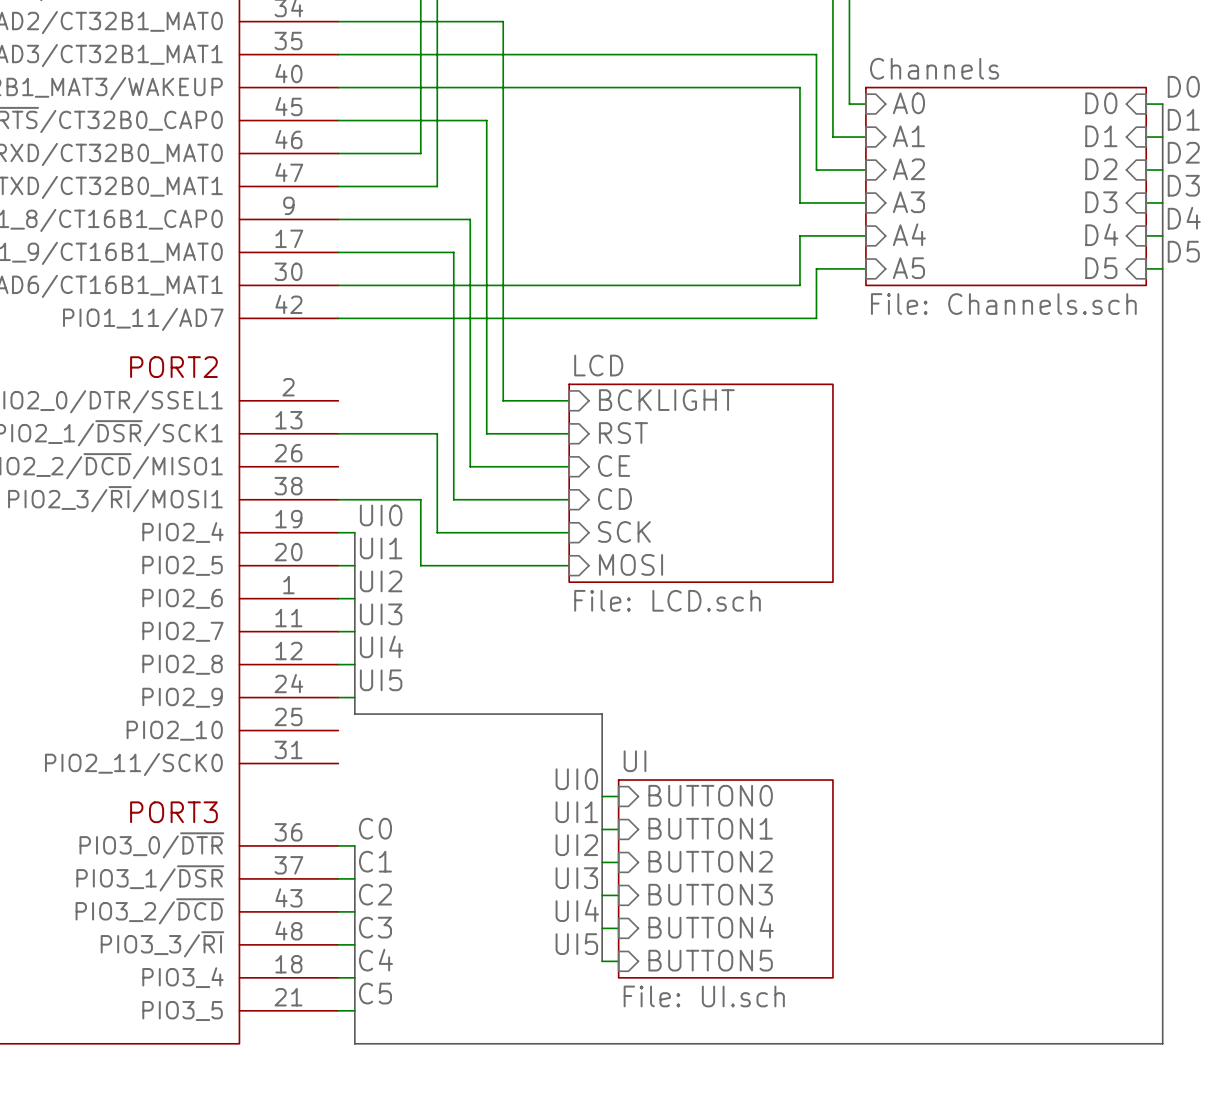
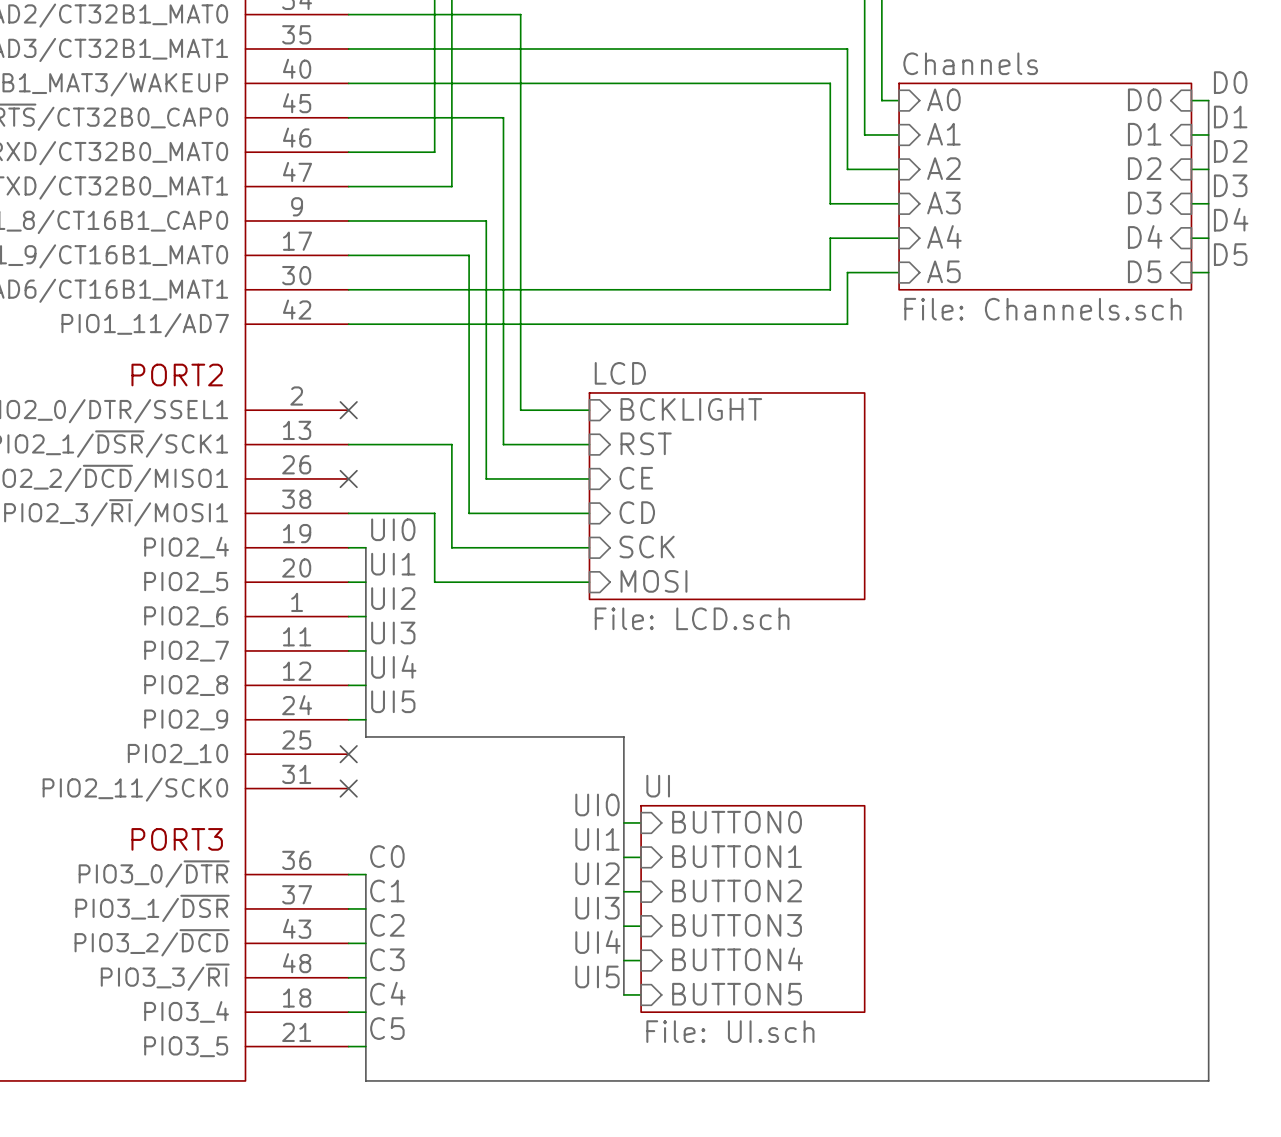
no-connect mark: none -> (348, 410)
no-connect mark: none -> (348, 478)
no-connect mark: none -> (348, 754)
no-connect mark: none -> (348, 788)

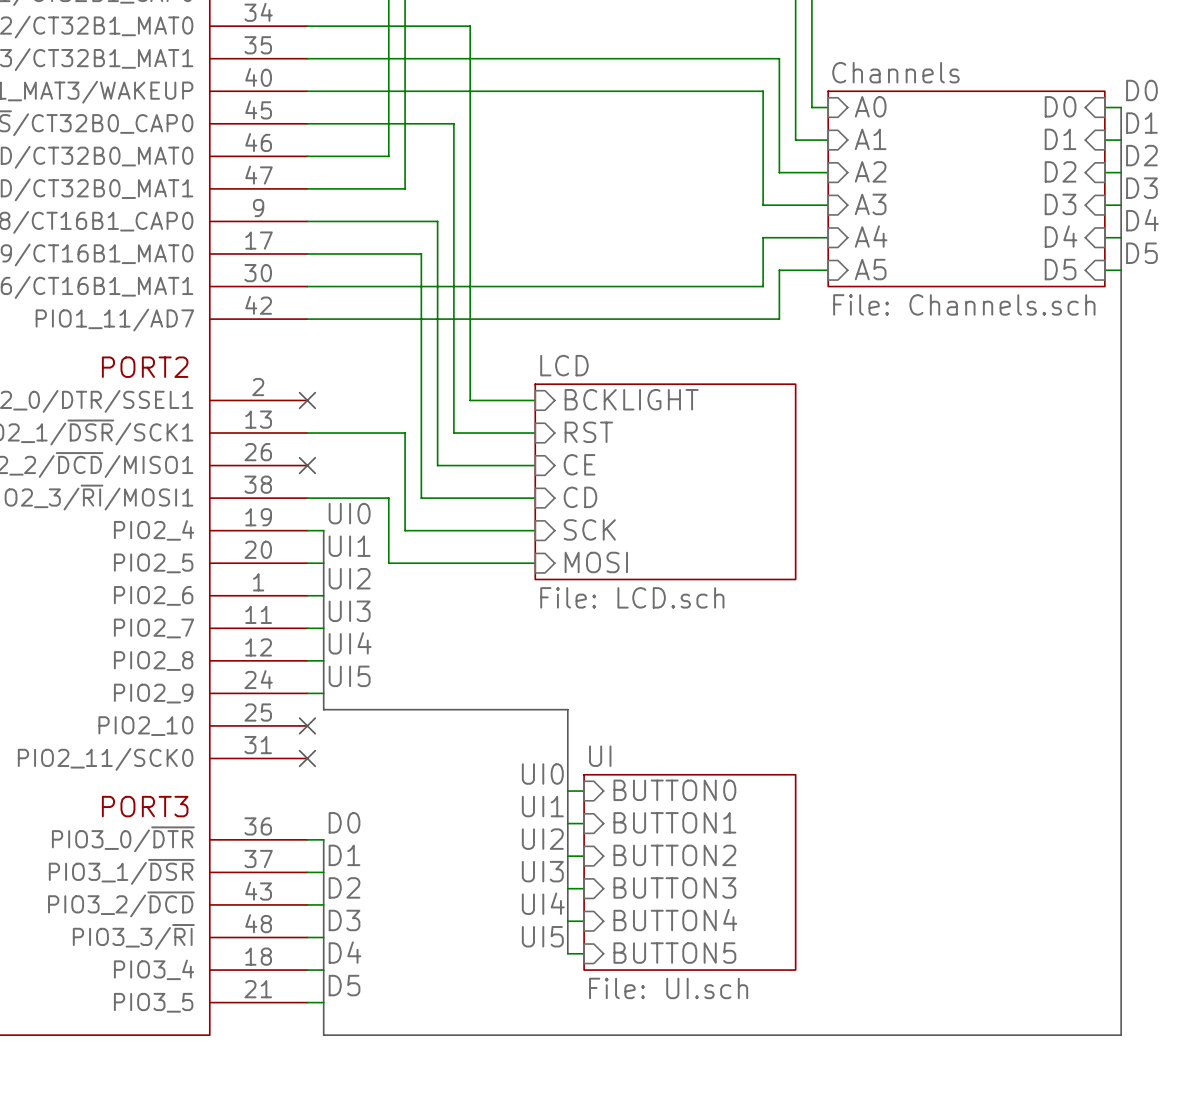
label: C0 (387, 856) -> D0 (344, 822)
label: C1 (387, 890) -> D1 (344, 855)
label: C2 (387, 925) -> D2 (344, 887)
label: C3 (387, 959) -> D3 (344, 920)
label: C4 (387, 993) -> D4 (344, 952)
label: C5 (387, 1028) -> D5 (344, 985)

